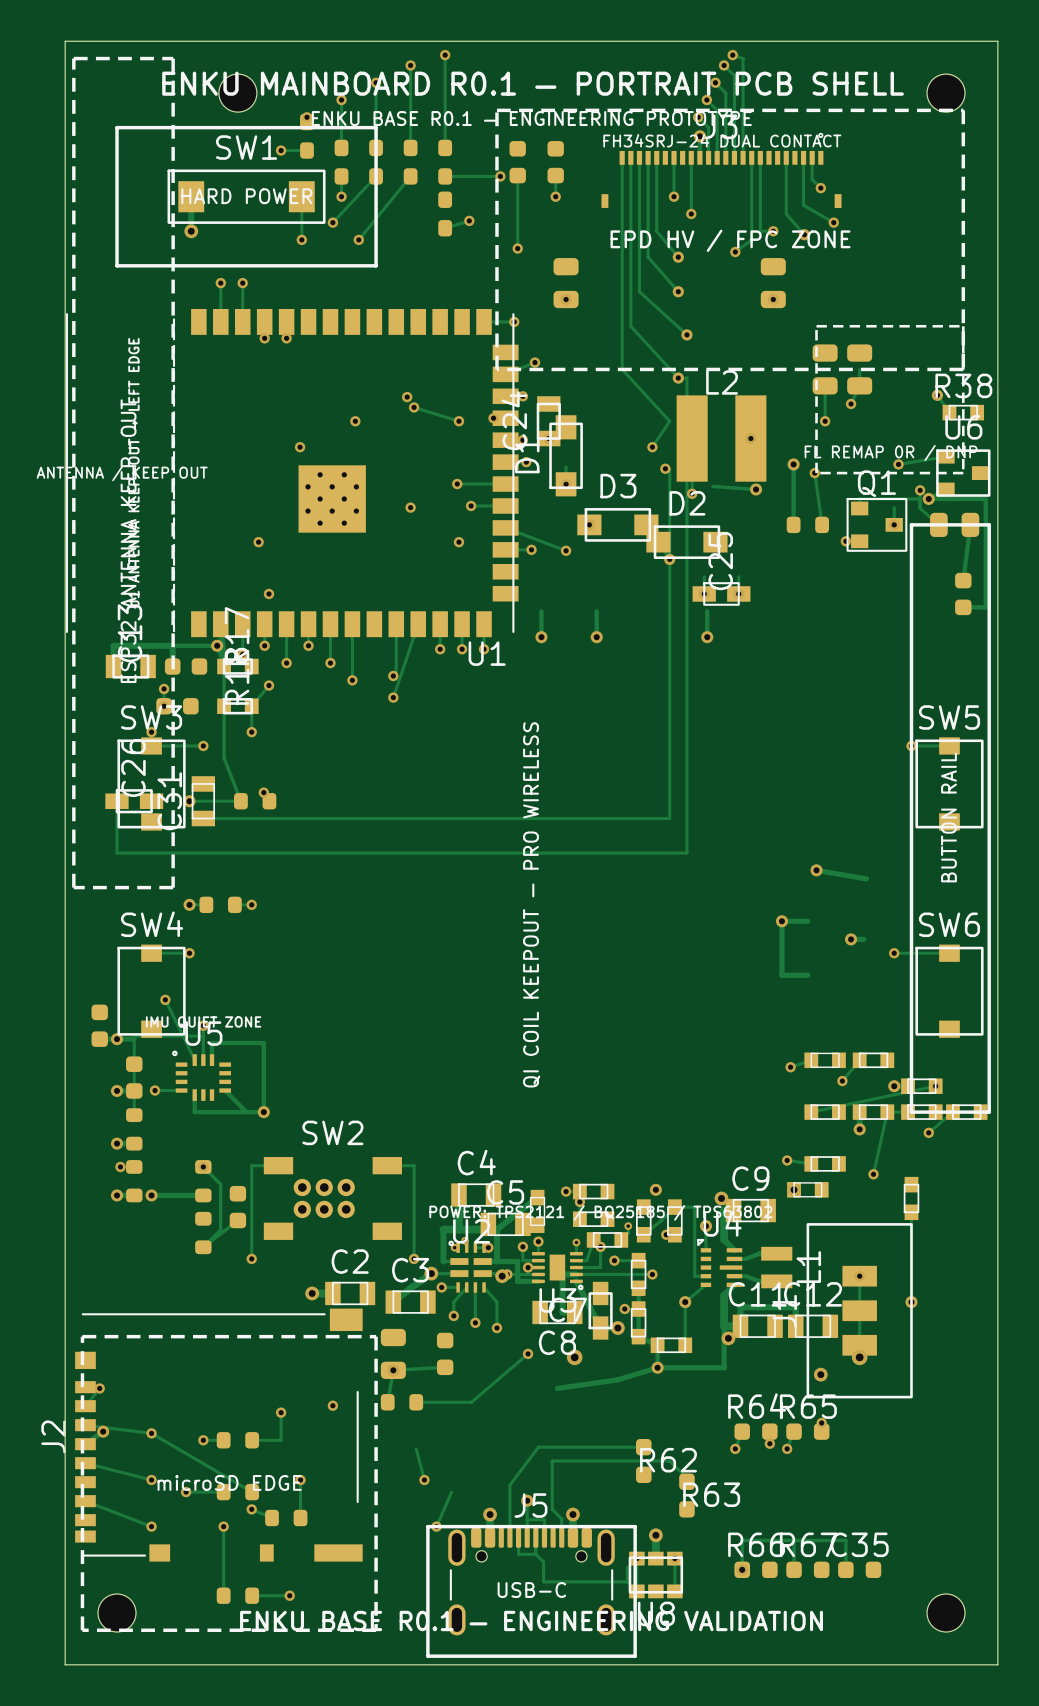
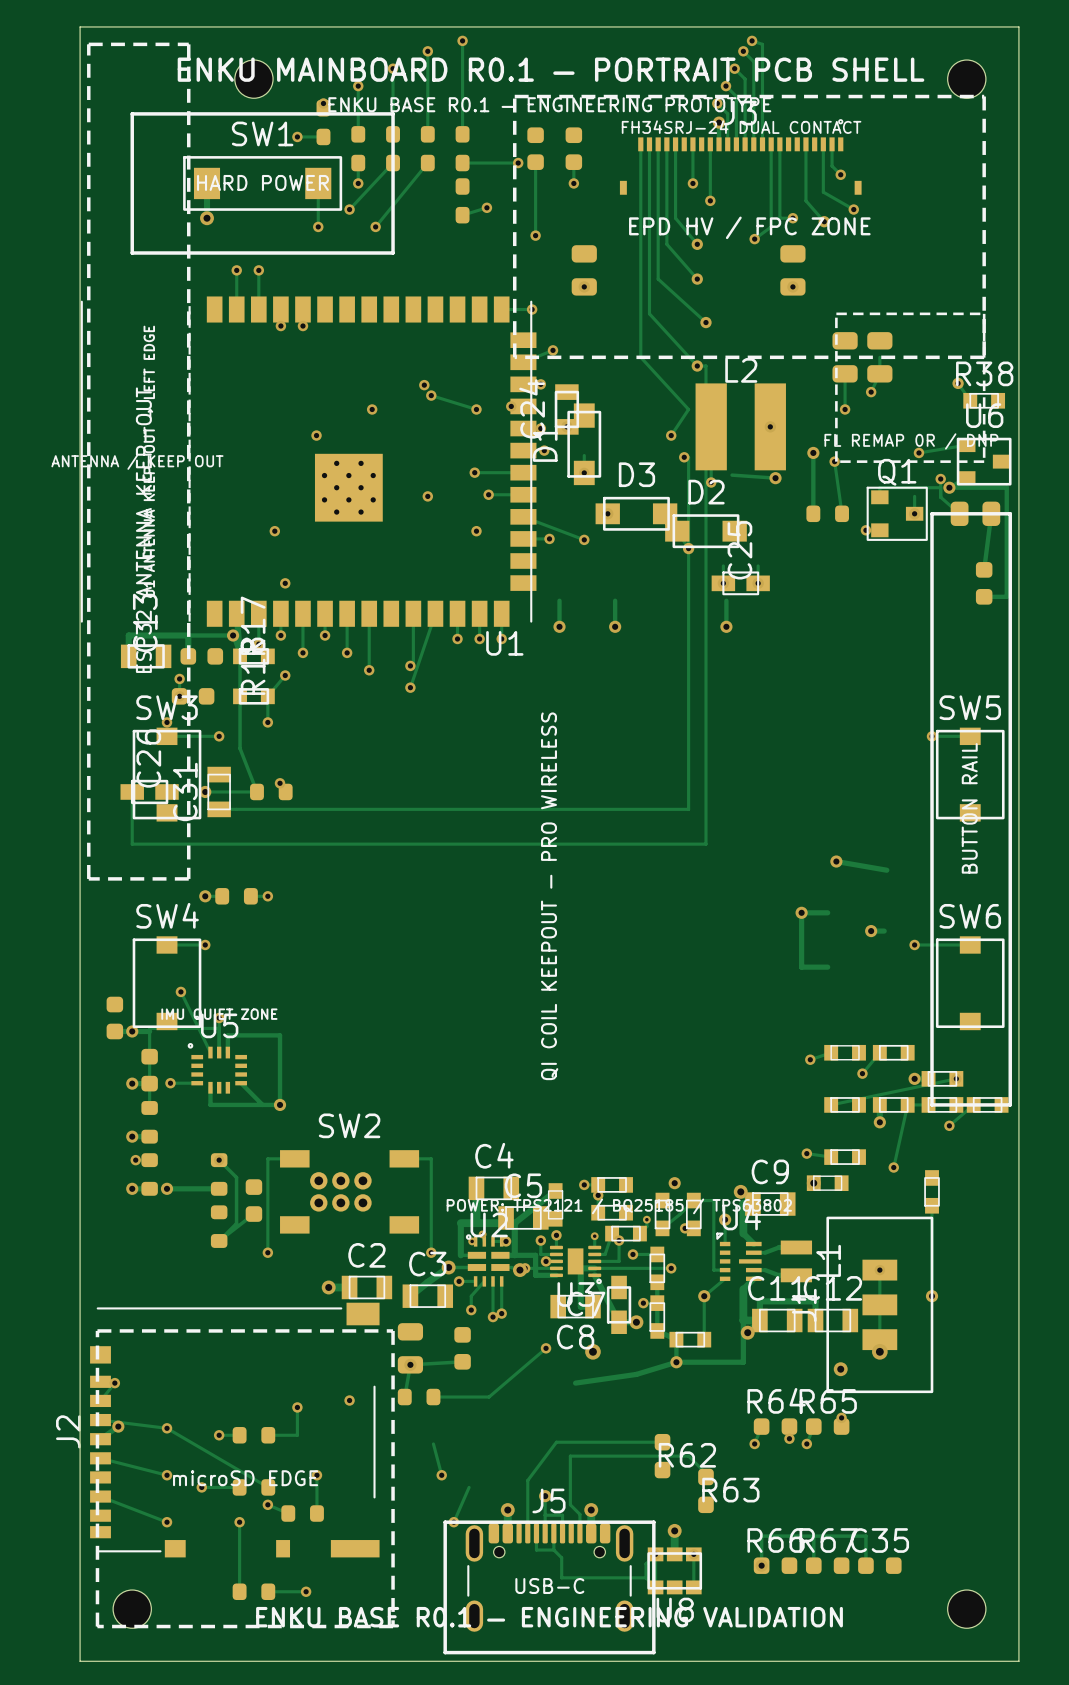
track: (484, 1287) (496, 1302) (496, 1328) -> (501, 1281) (501, 1313)
via position: (496, 1328) -> (501, 1313)

